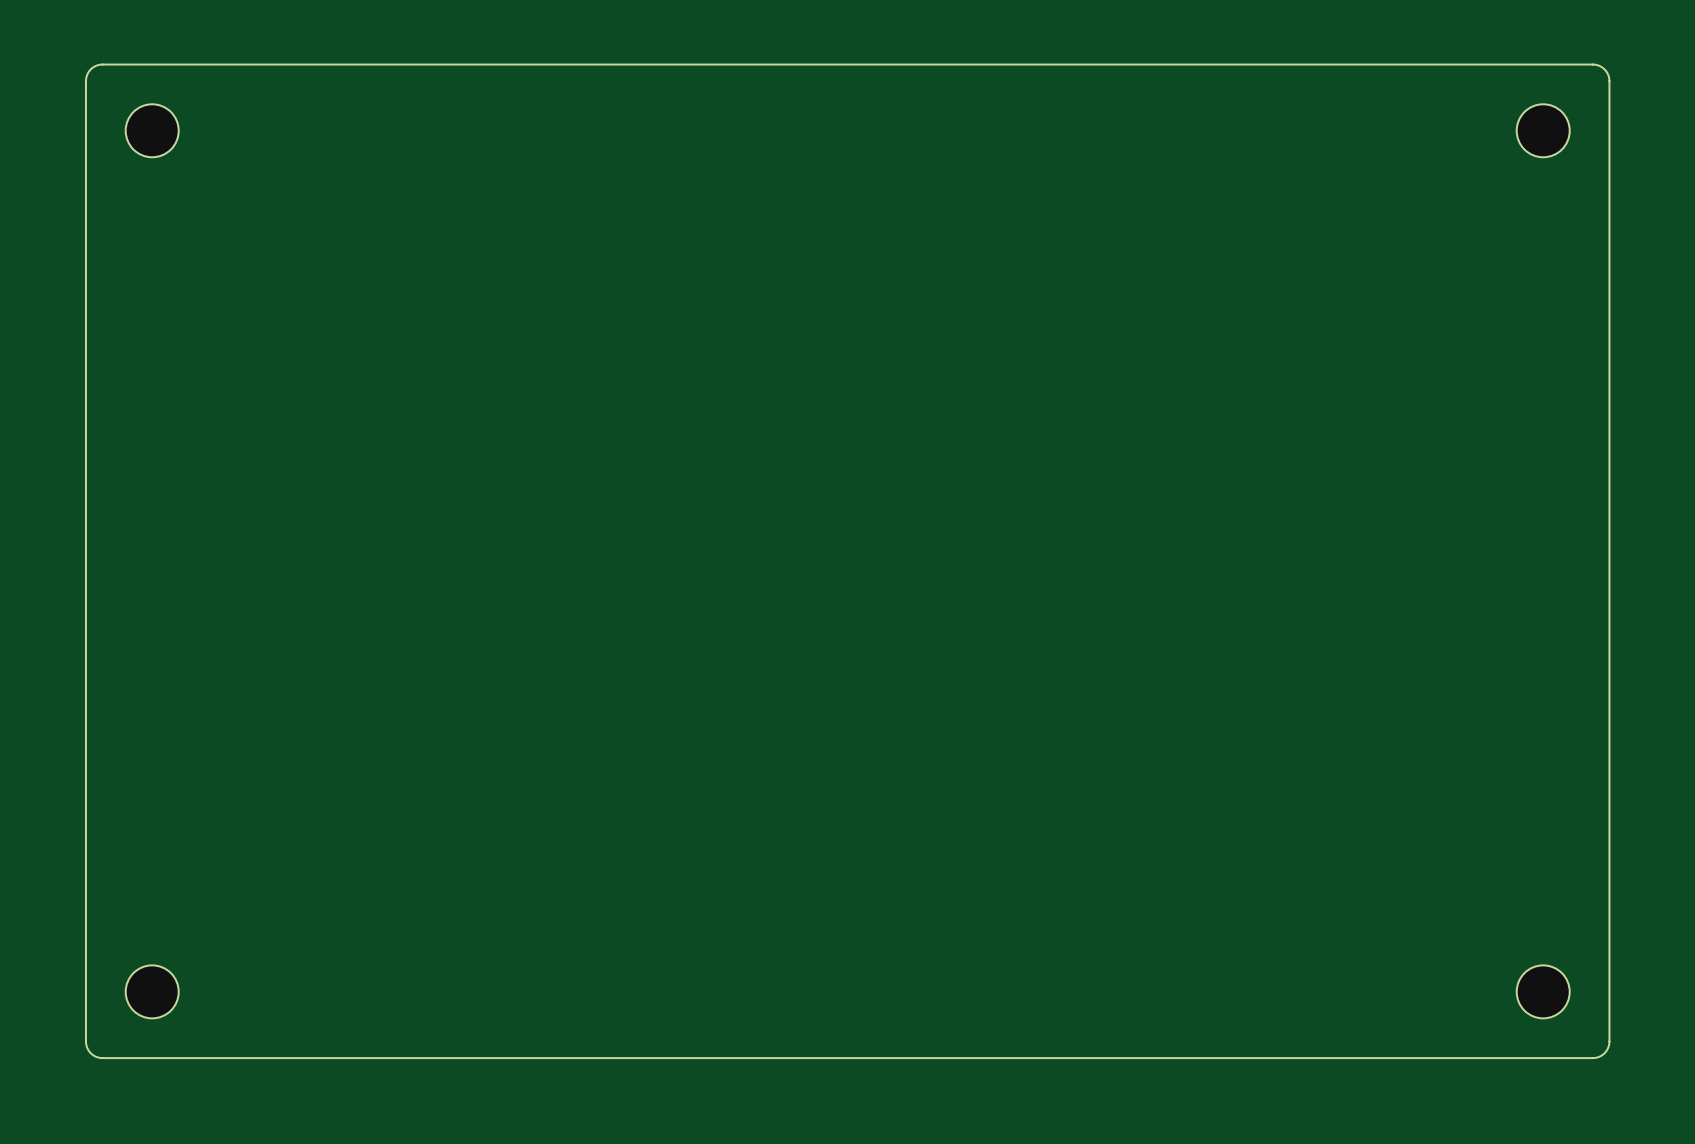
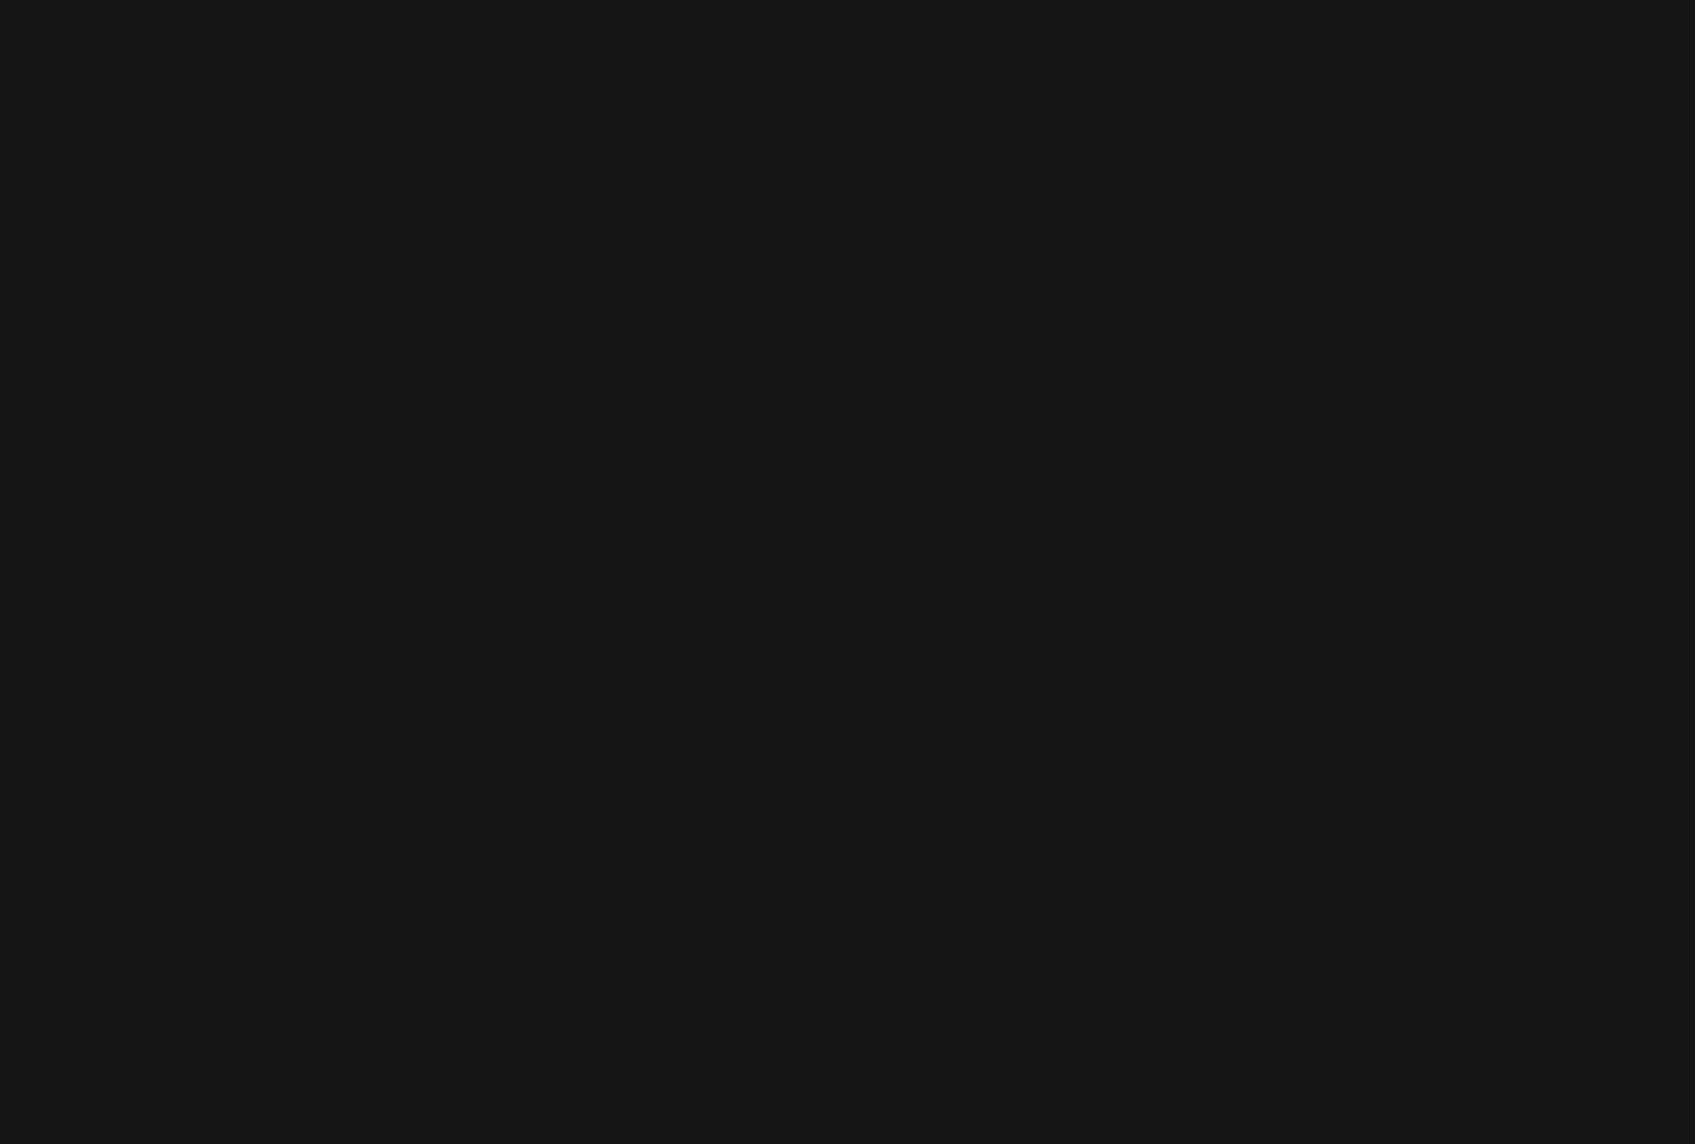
board edge: (1592, 64) (102, 64) (94, 66) (88, 72) (85, 81) (85, 1041) (88, 1049) (94, 1055) (102, 1058) (1592, 1058) (1601, 1055) (1607, 1049) (1609, 1041) (1609, 81) (1604, 69) (1592, 64) -> none
part: (152, 130) -> none
part: (1543, 130) -> none
part: (152, 991) -> none
part: (1543, 991) -> none

